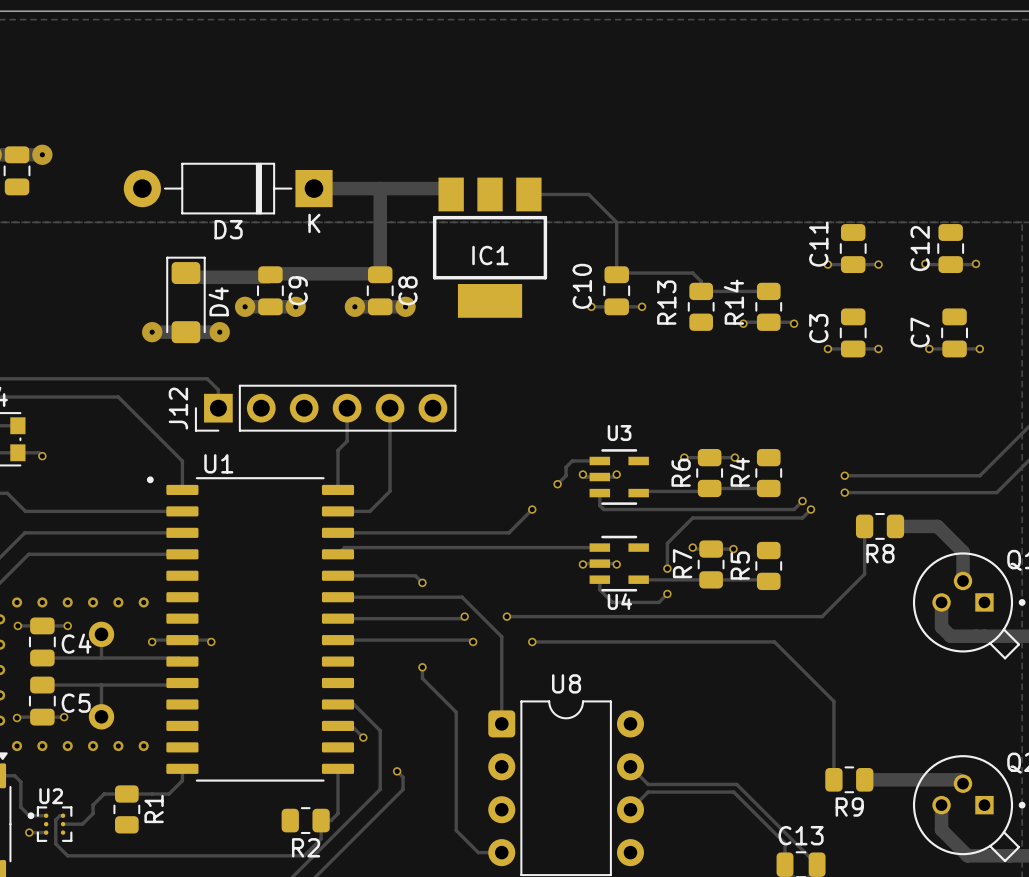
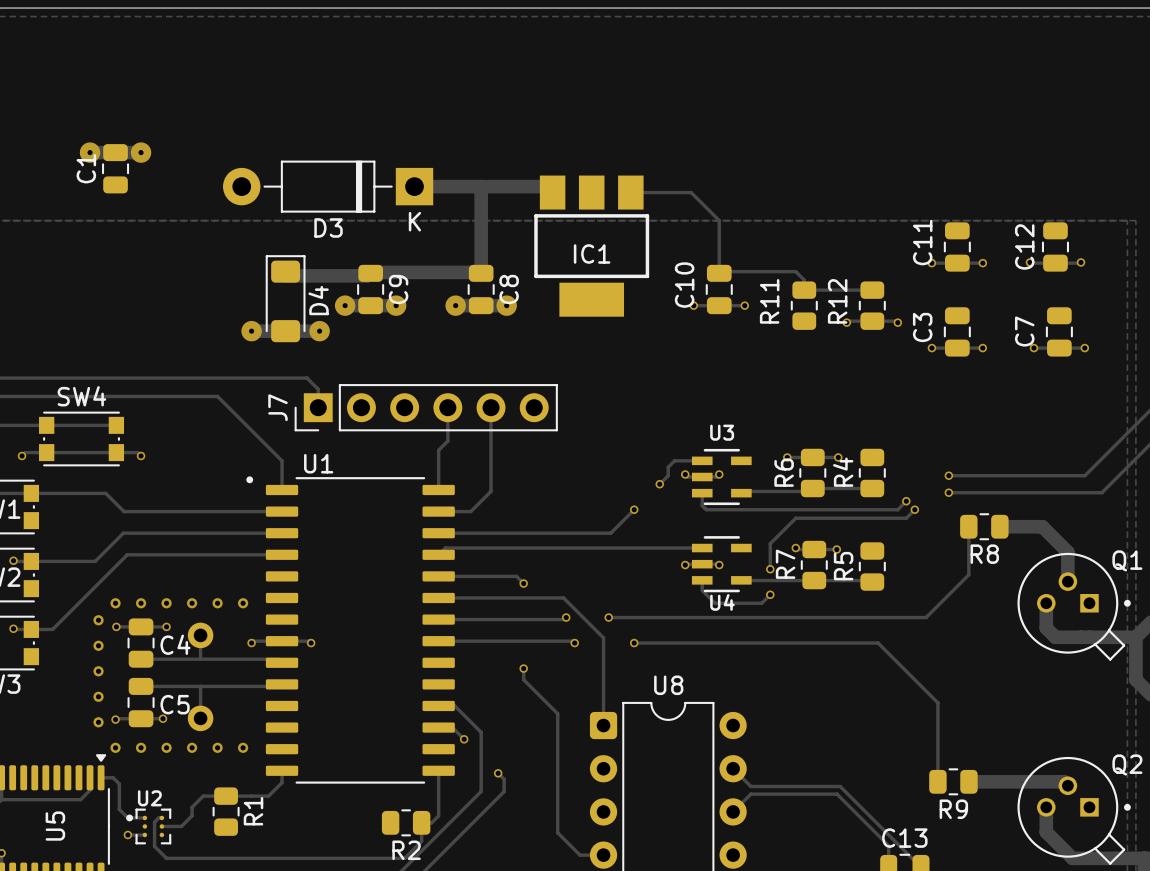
R13 name: R13 (666, 302) -> R11 (769, 301)
R14 name: R14 (733, 302) -> R12 (837, 301)
J12 name: J12 (178, 408) -> J7 (277, 407)

